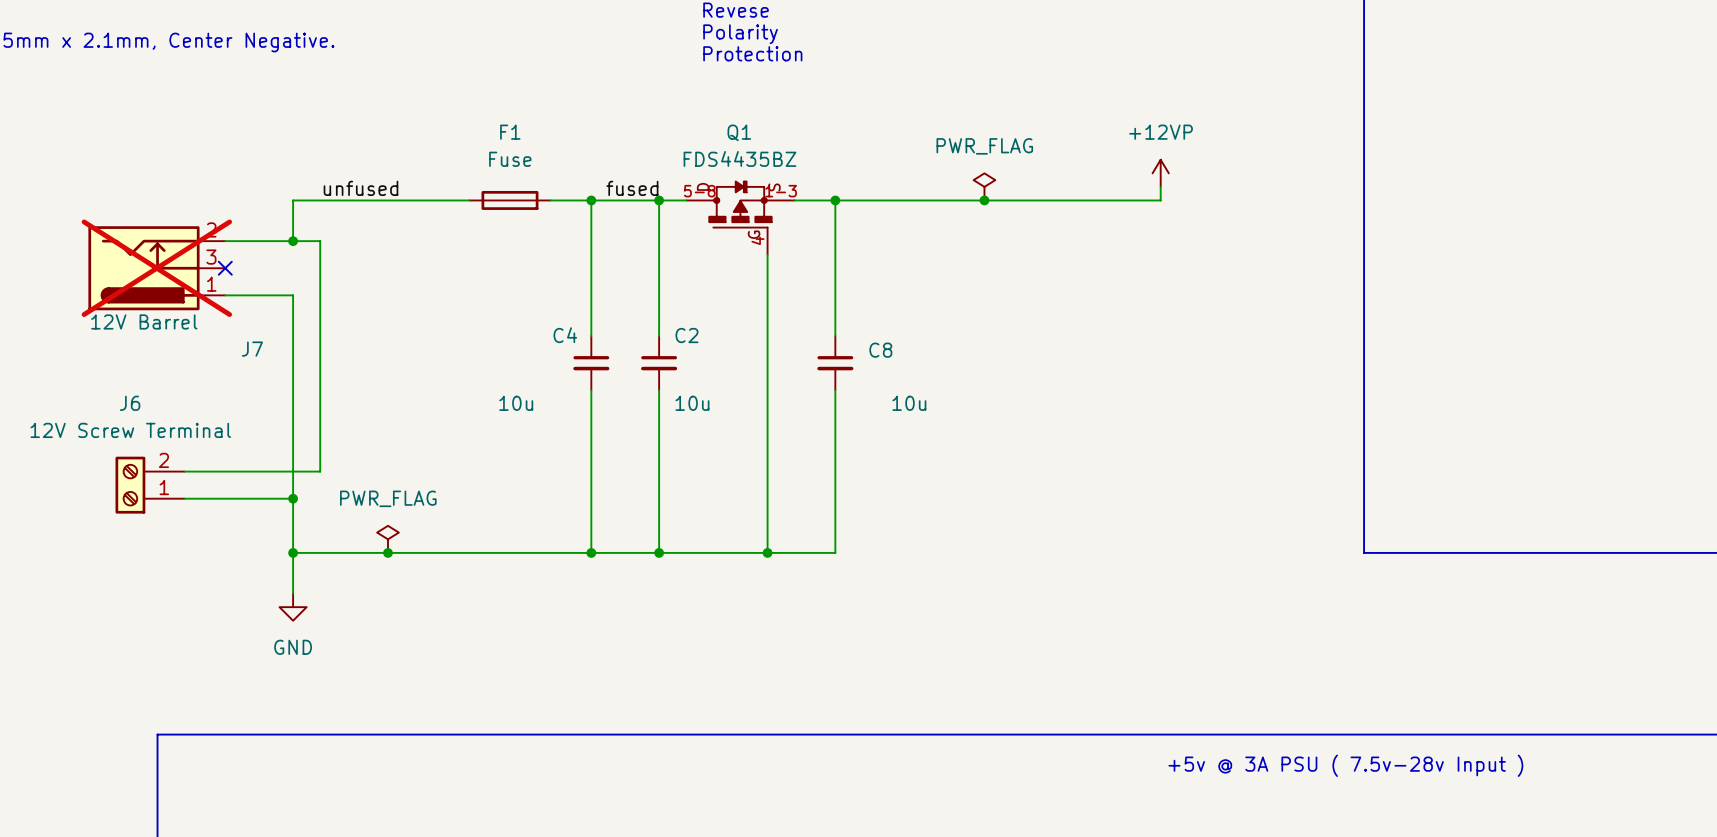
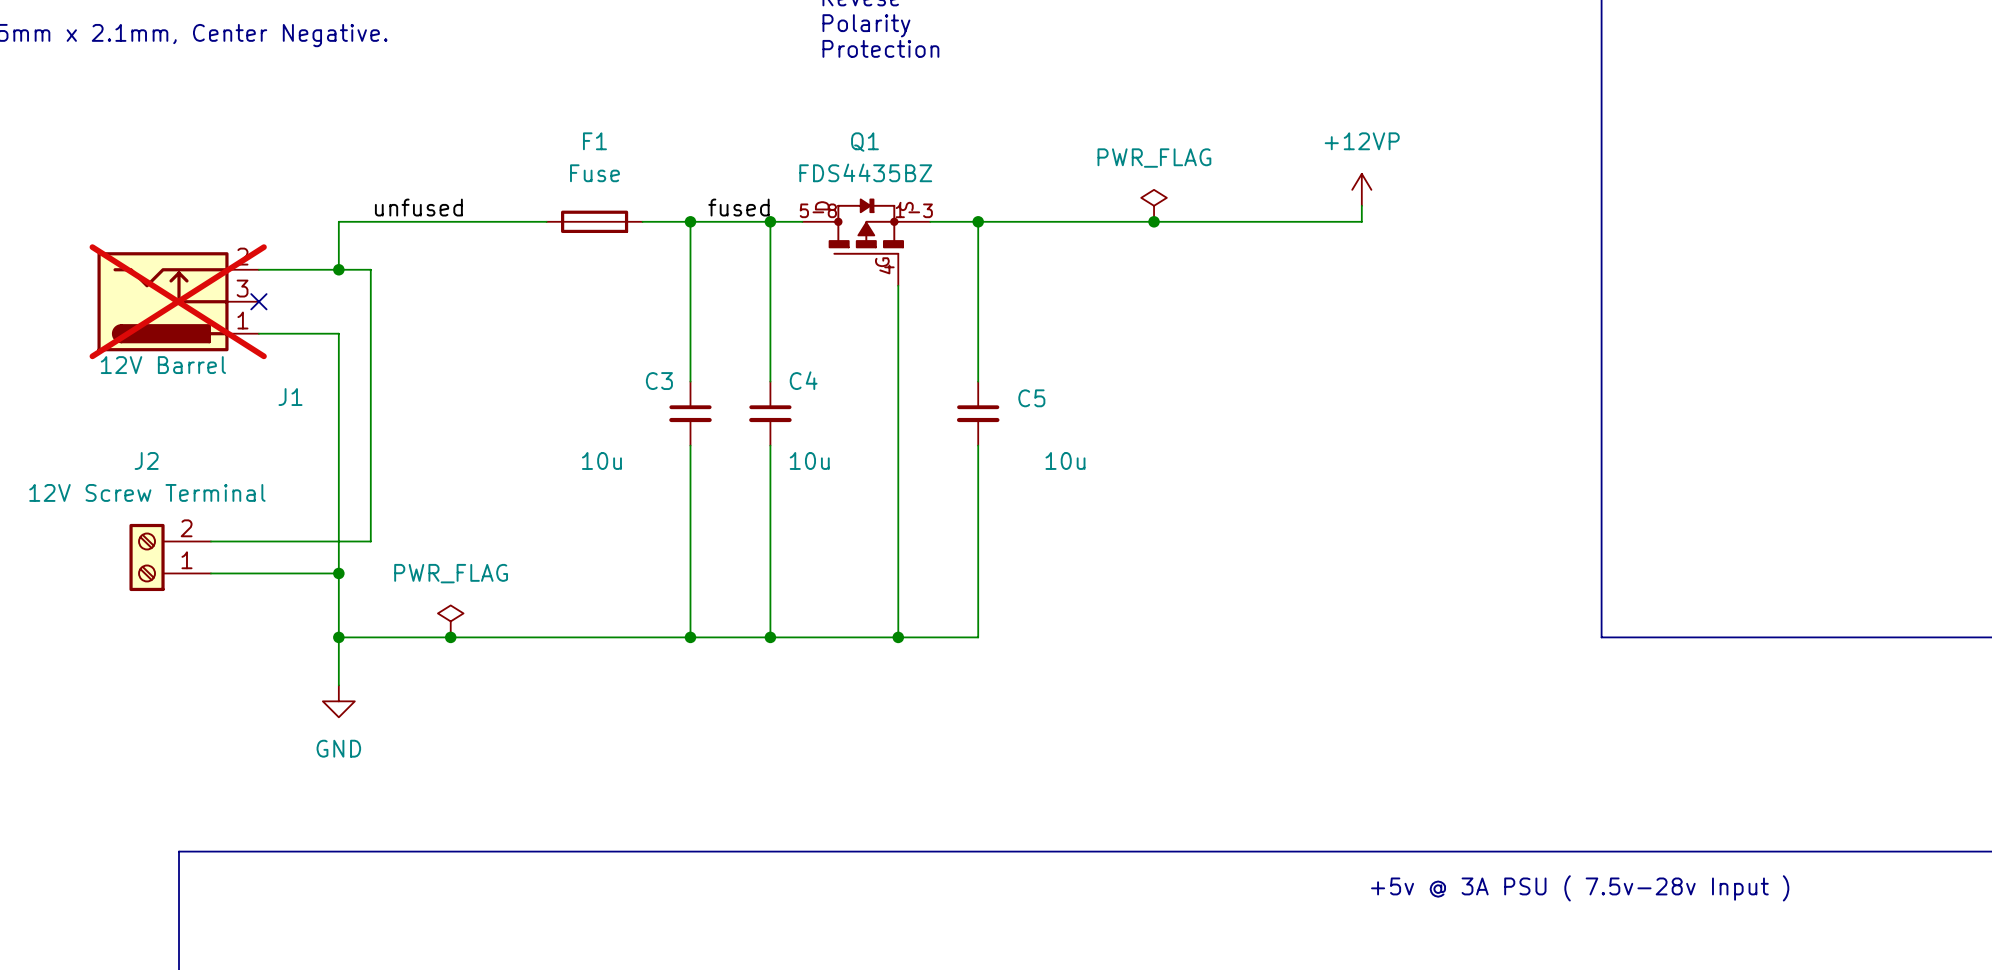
C4 name: C4 (565, 335) -> C3 (659, 381)
C2 name: C2 (686, 335) -> C4 (803, 380)
J7 name: J7 (252, 349) -> J1 (290, 397)
C8 name: C8 (880, 350) -> C5 (1031, 398)
J6 name: J6 (130, 403) -> J2 (146, 460)

